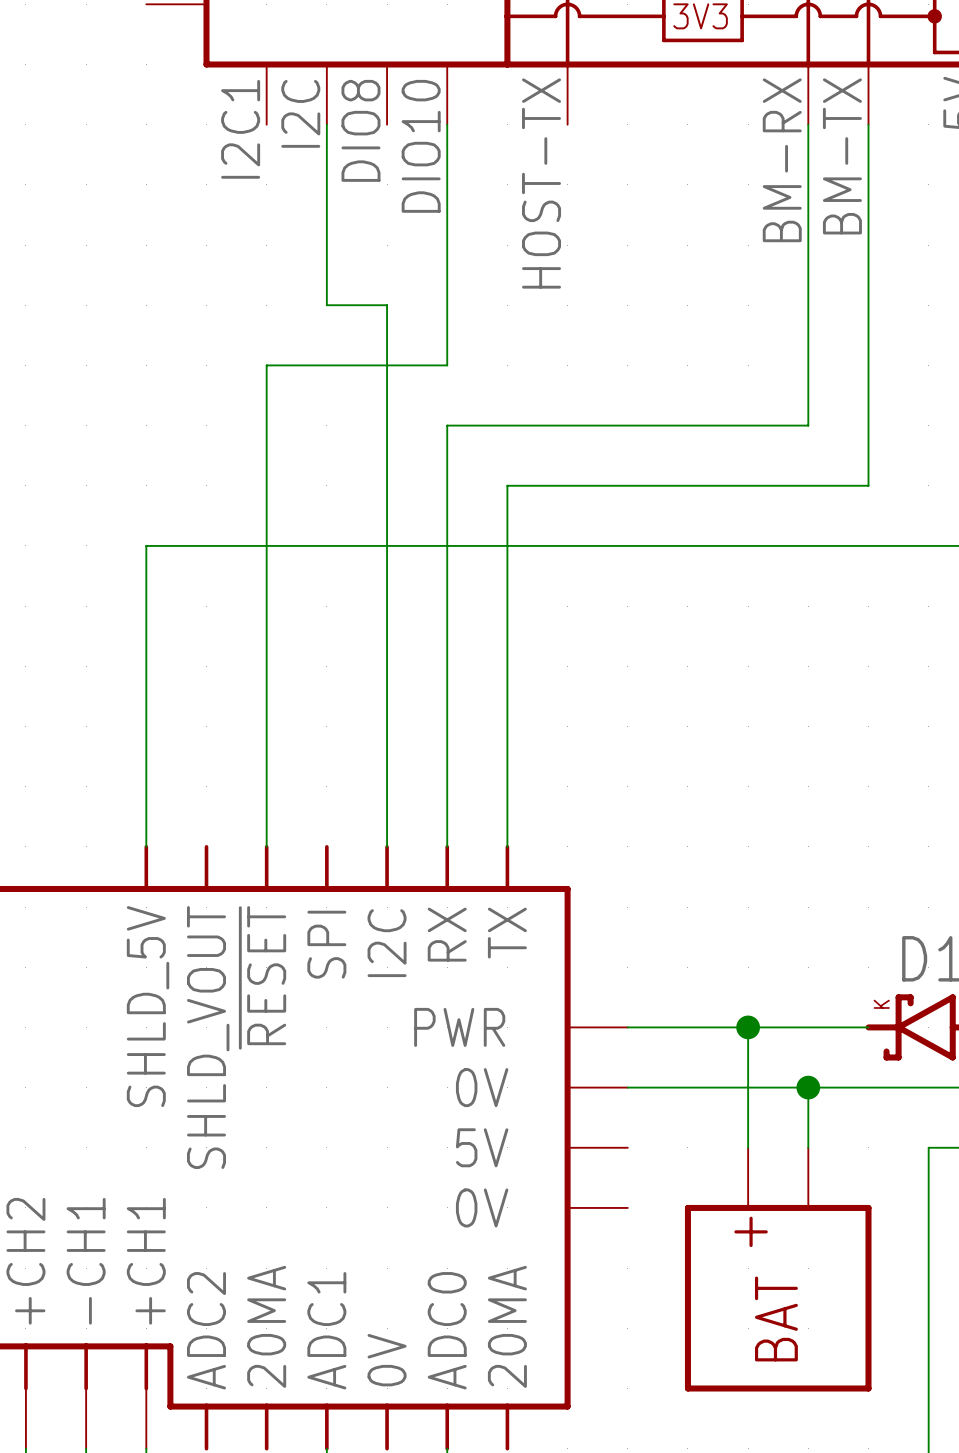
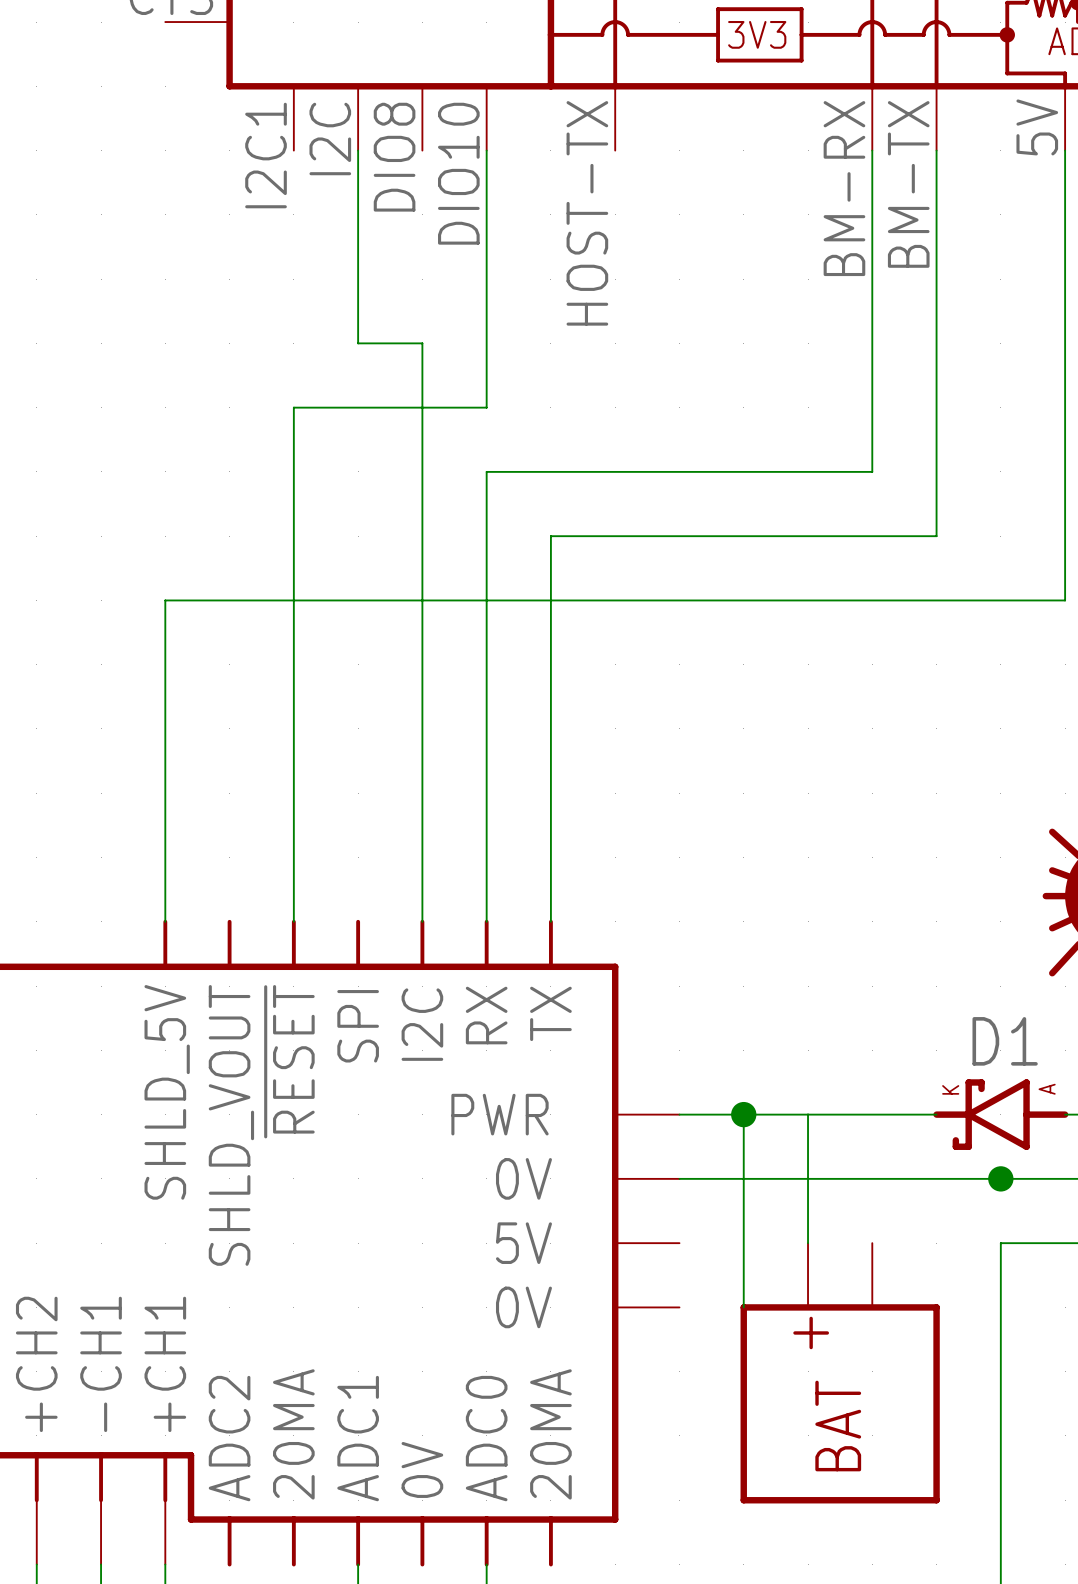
wire: none -> (743, 1114) (743, 1307)
junction position: (748, 1027) -> (743, 1114)
wire: (808, 1087) (808, 1147) -> none
junction: (808, 1087) -> none
junction: none -> (1000, 1178)

